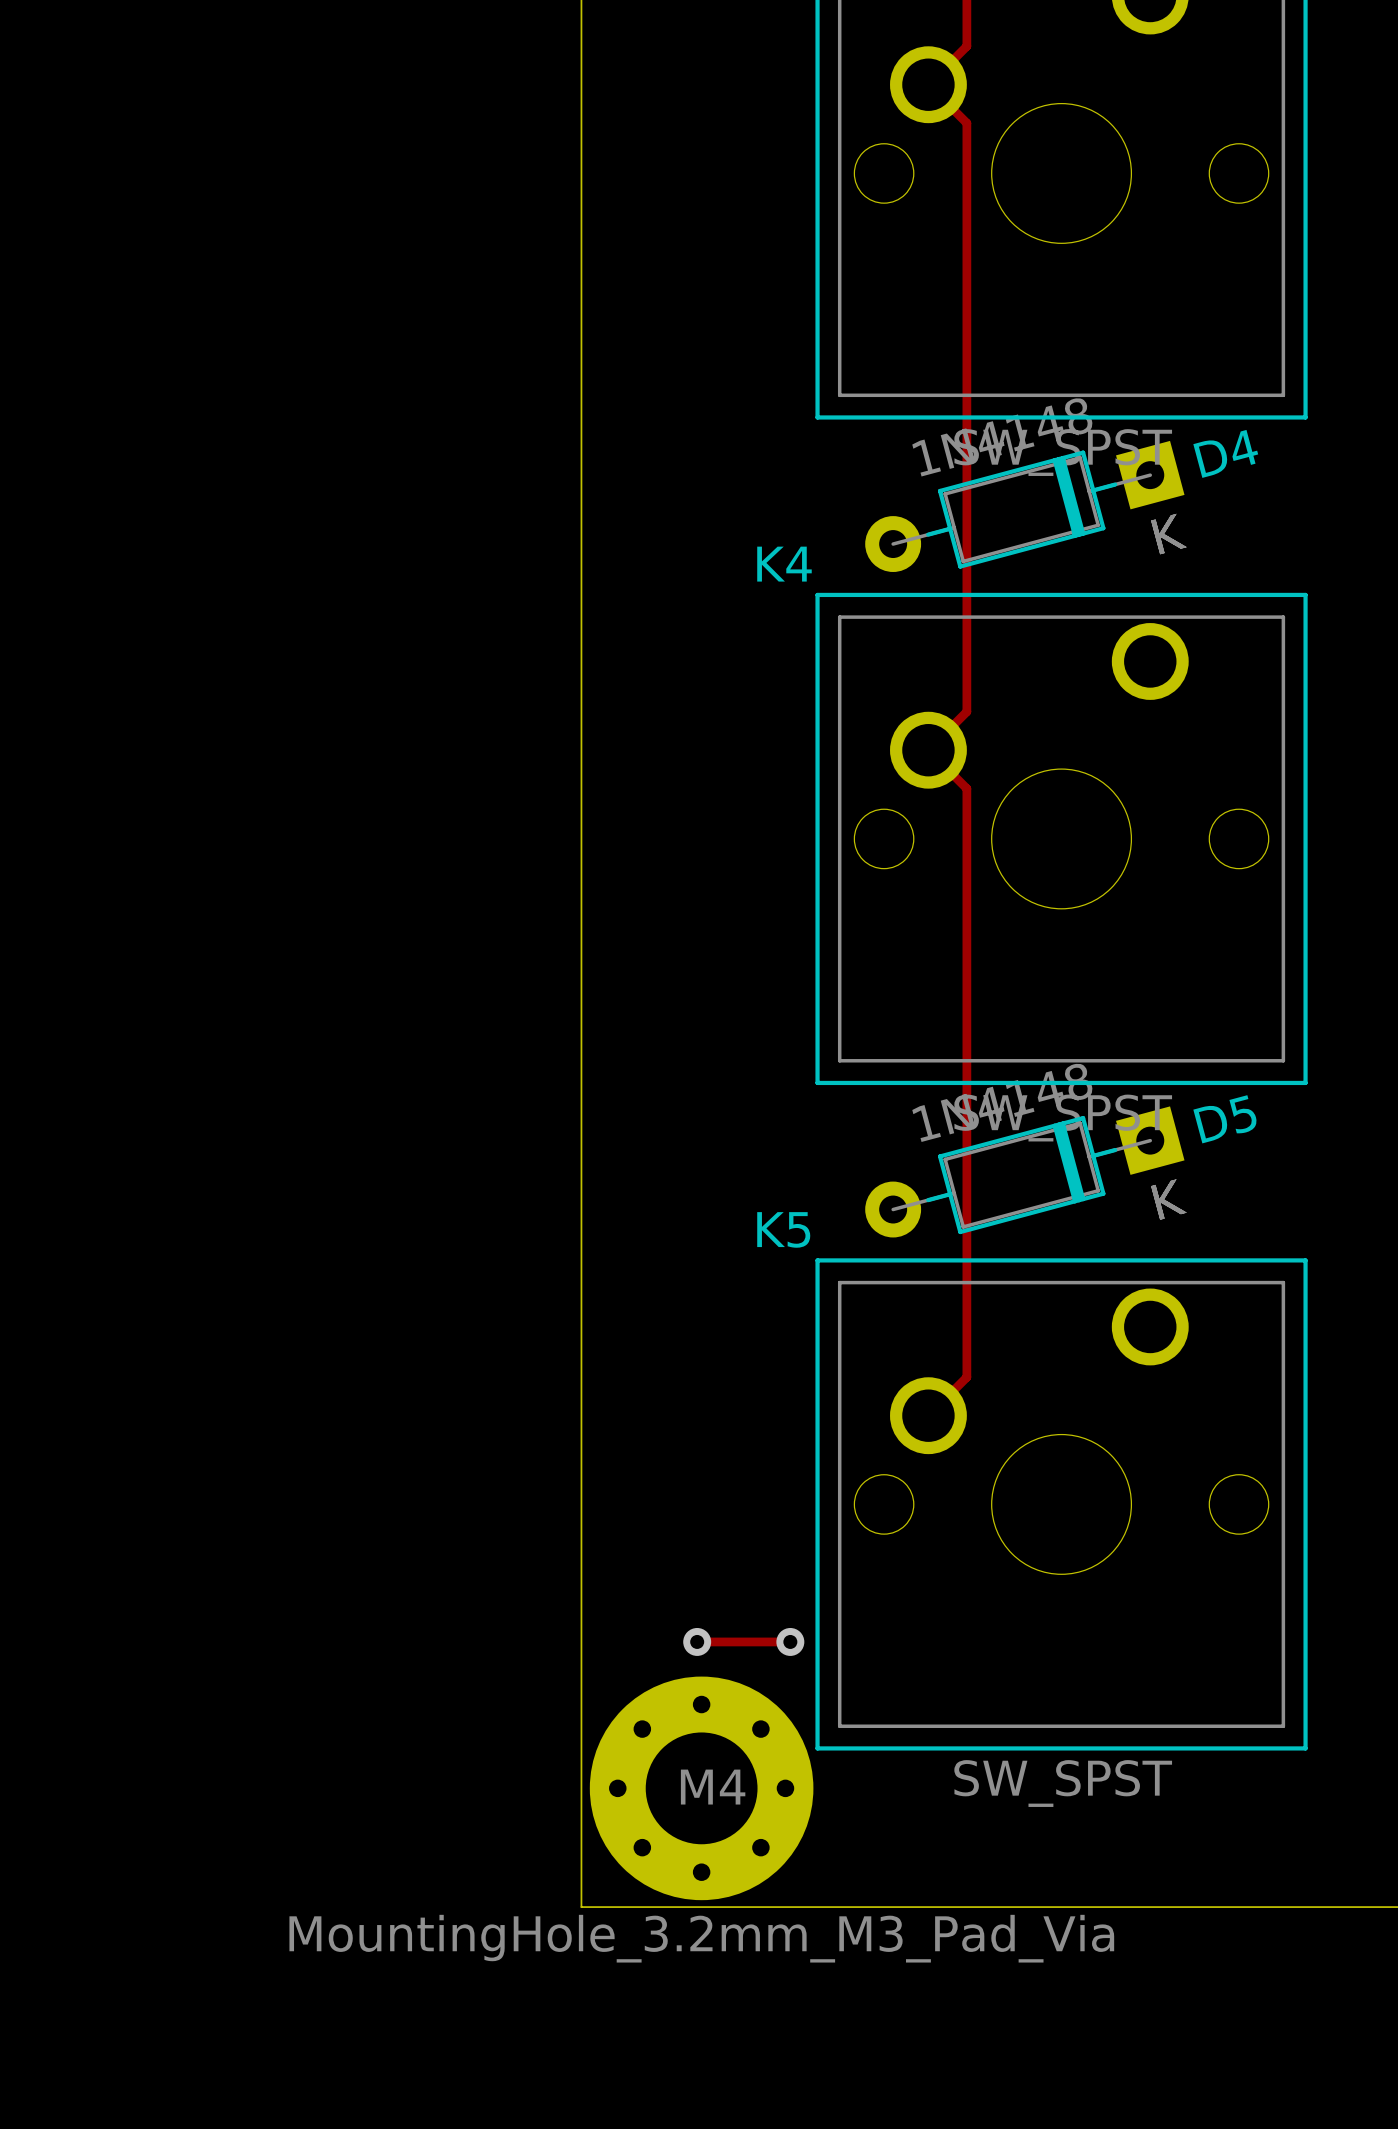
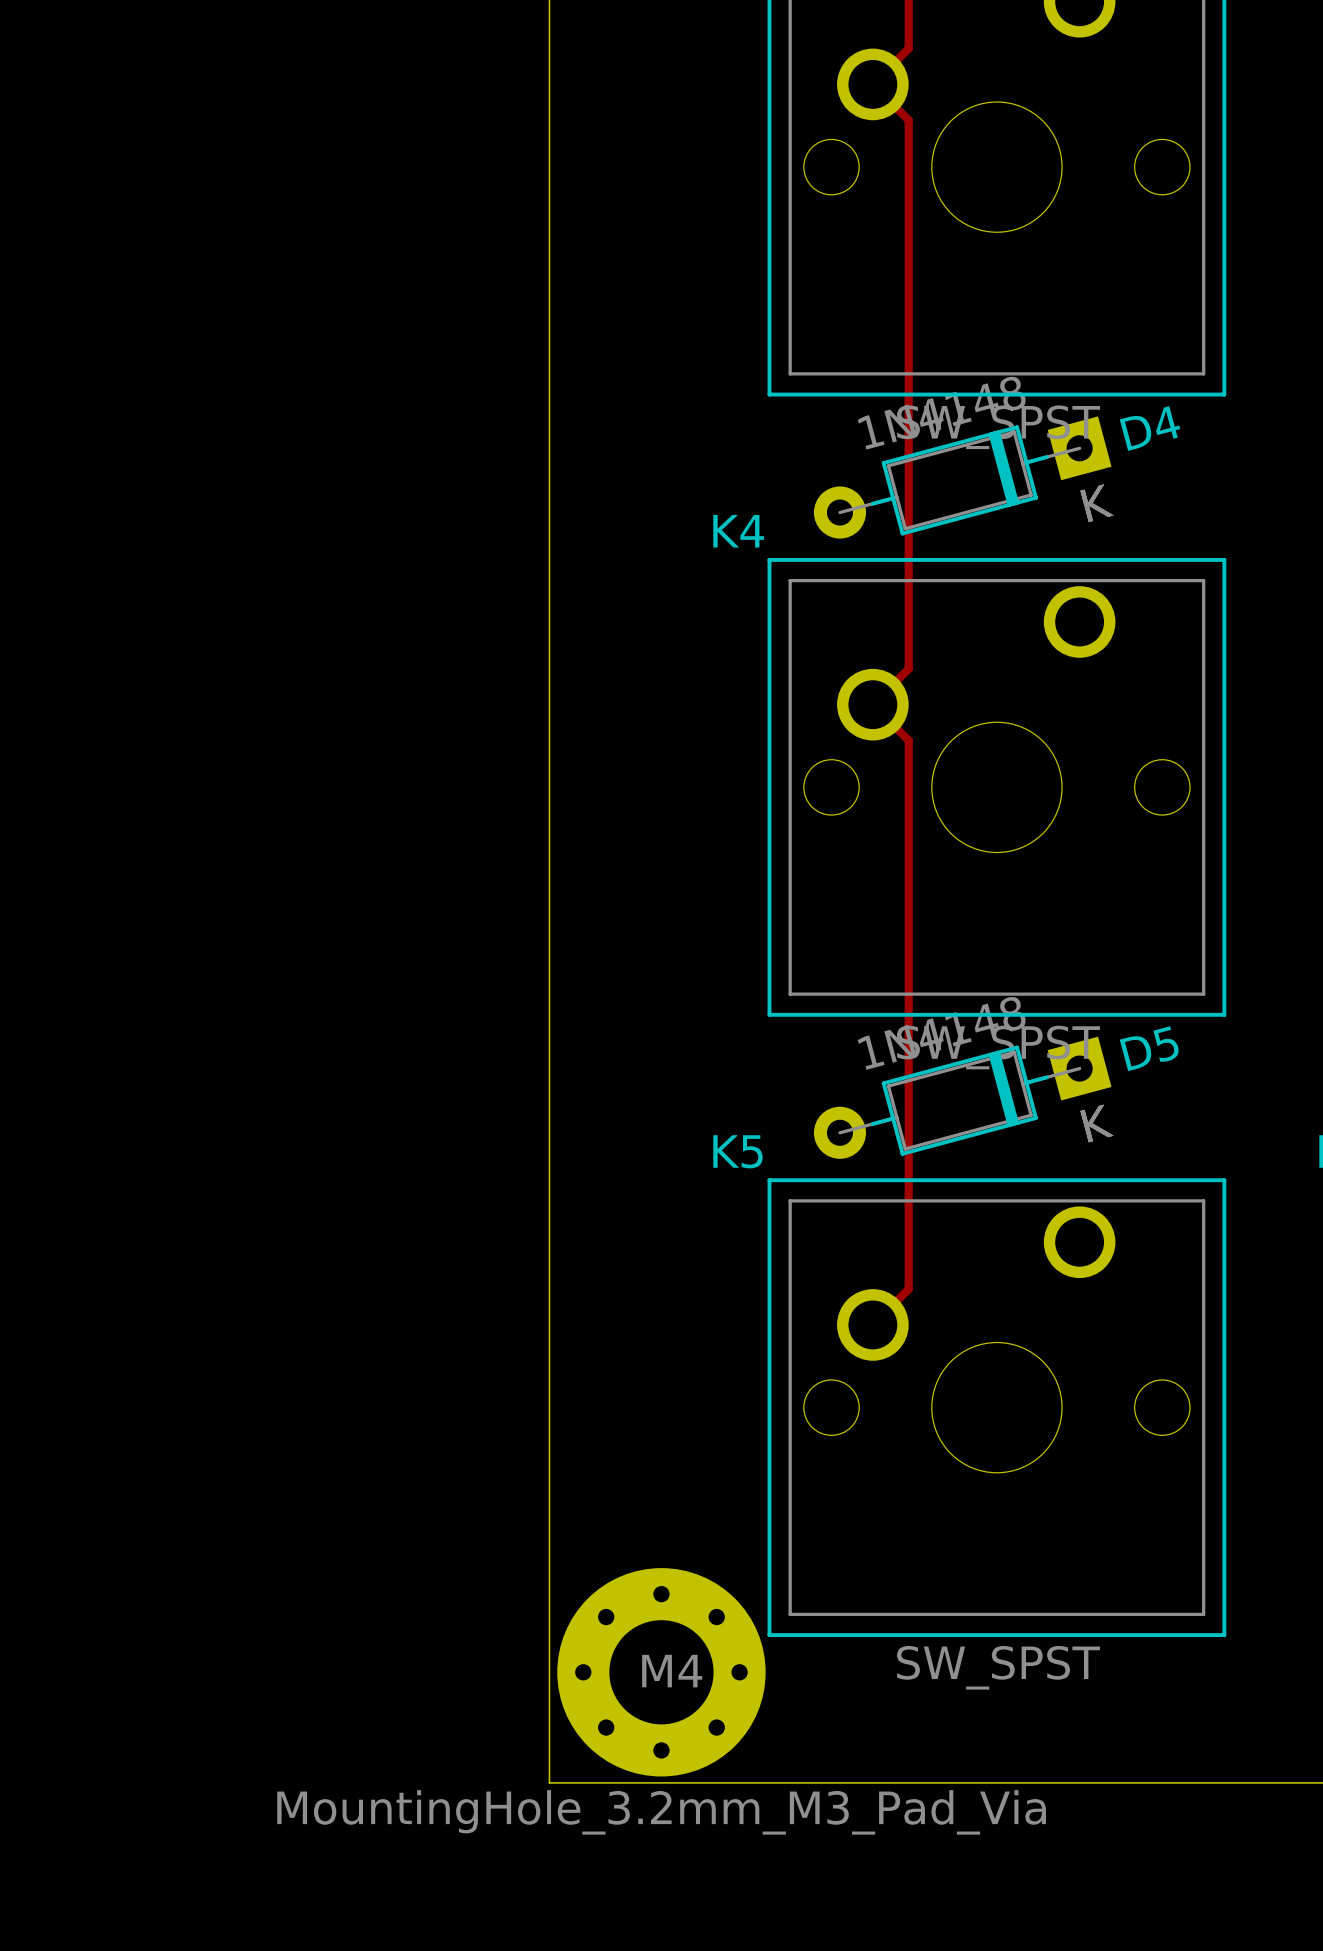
track: (697, 1641) (790, 1641) -> none
via: (697, 1641) -> none
via: (790, 1641) -> none

